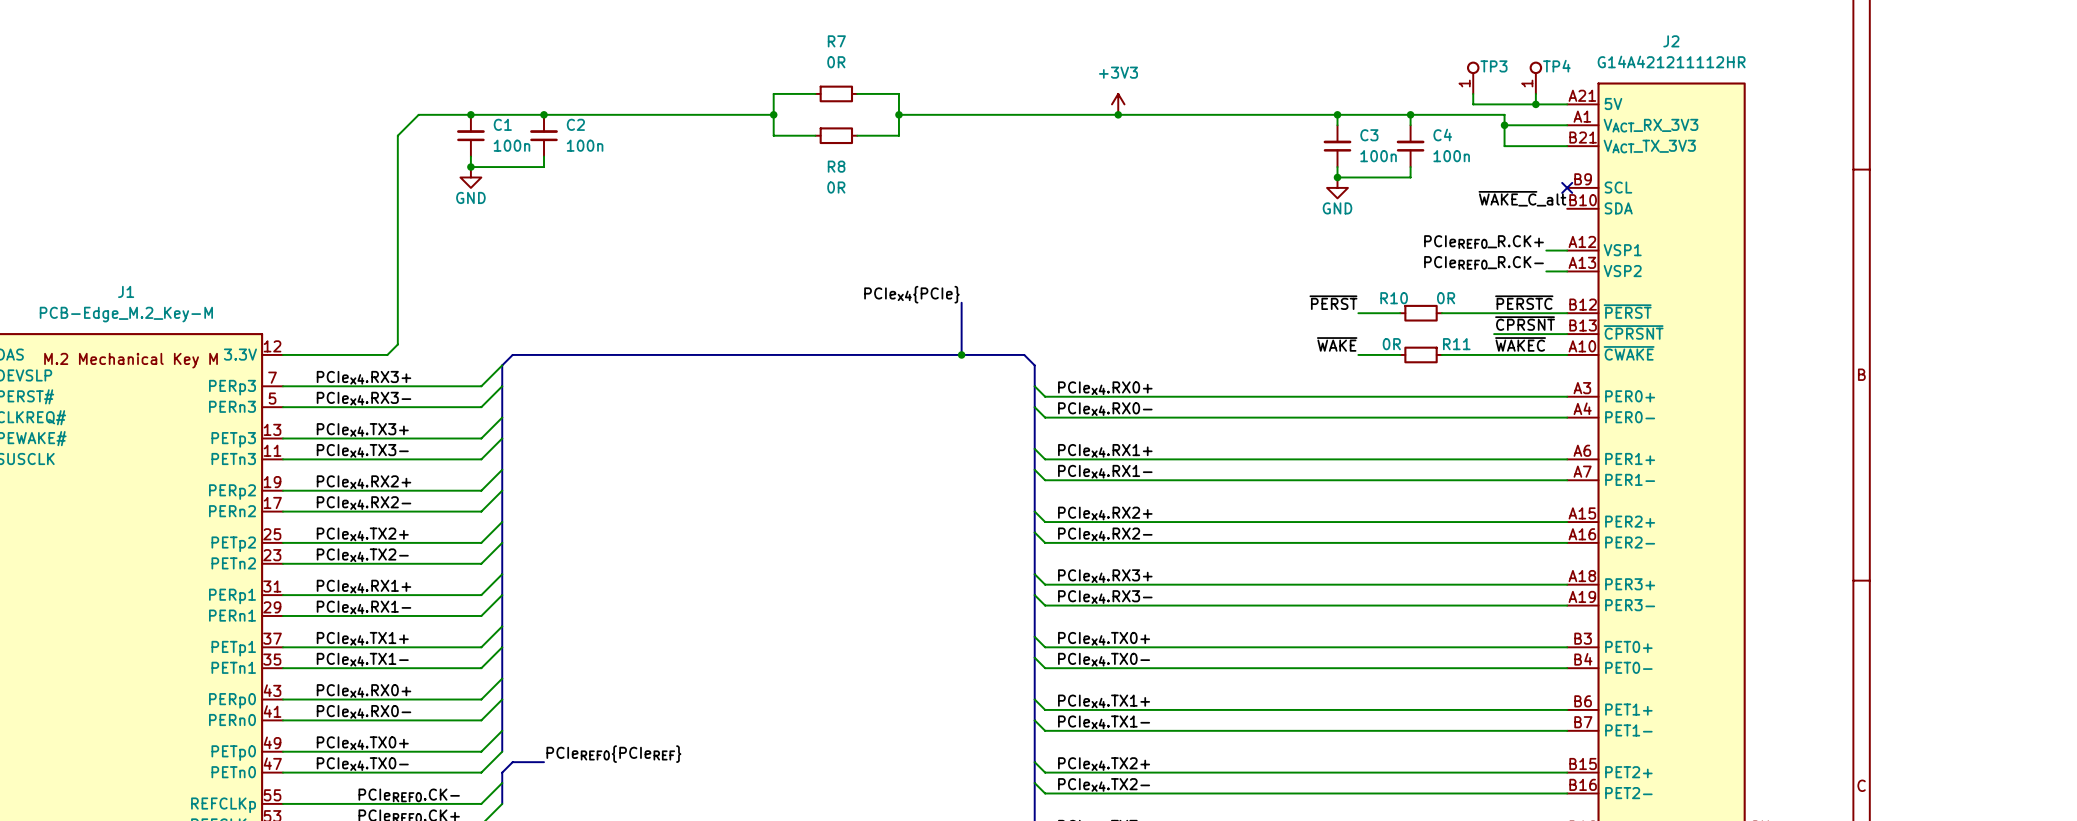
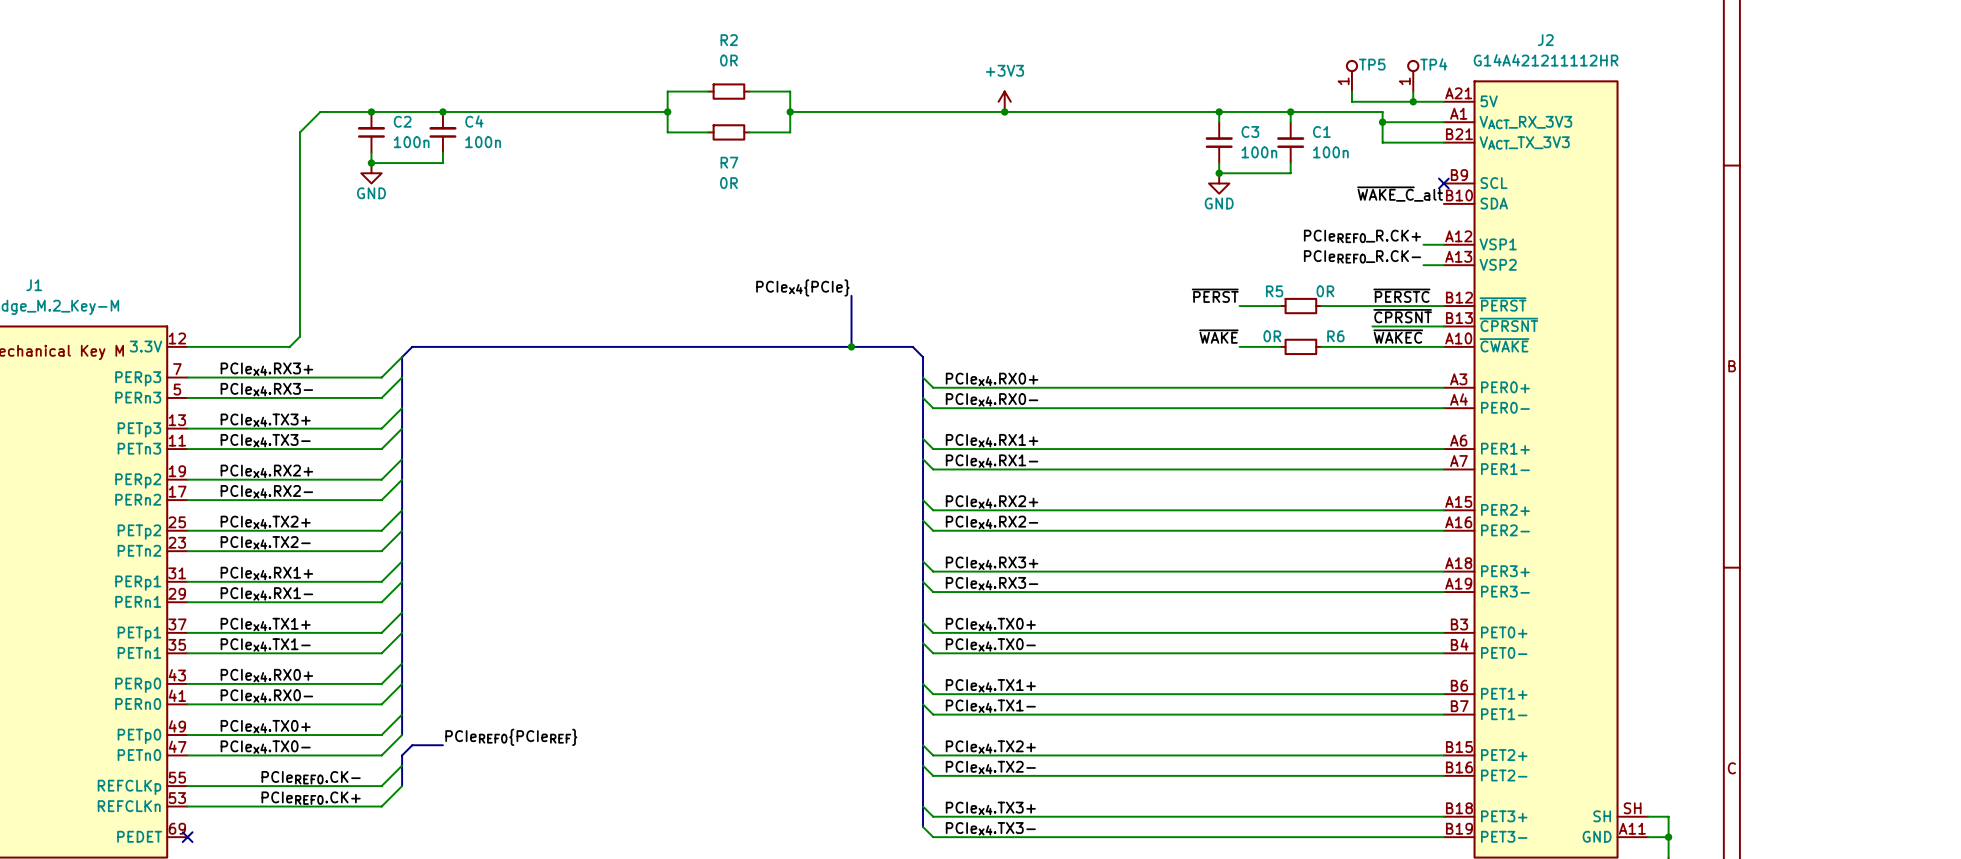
R7 name: R7 (836, 41) -> R2 (729, 40)
TP3 name: TP3 (1493, 66) -> TP5 (1372, 64)
C1 name: C1 (502, 124) -> C2 (402, 121)
C2 name: C2 (575, 124) -> C4 (474, 121)
C4 name: C4 (1442, 135) -> C1 (1321, 131)
R8 name: R8 (836, 166) -> R7 (729, 162)
R10 name: R10 (1394, 298) -> R5 (1274, 291)
R11 name: R11 (1456, 344) -> R6 (1335, 336)

